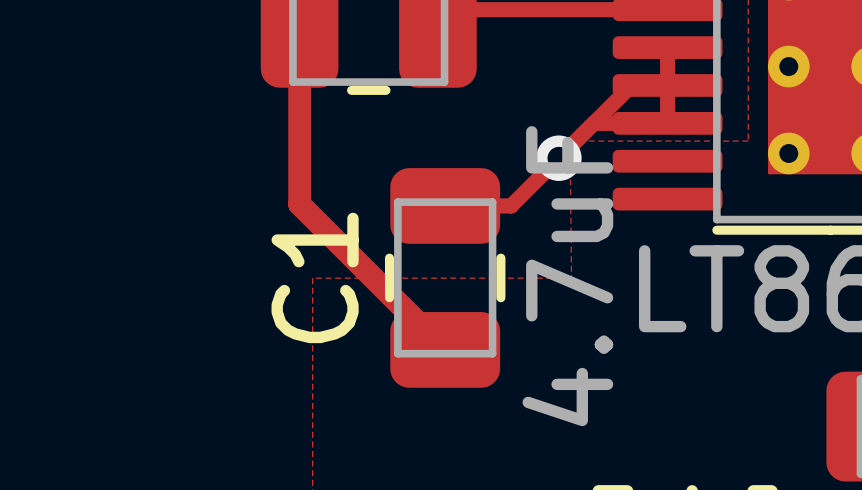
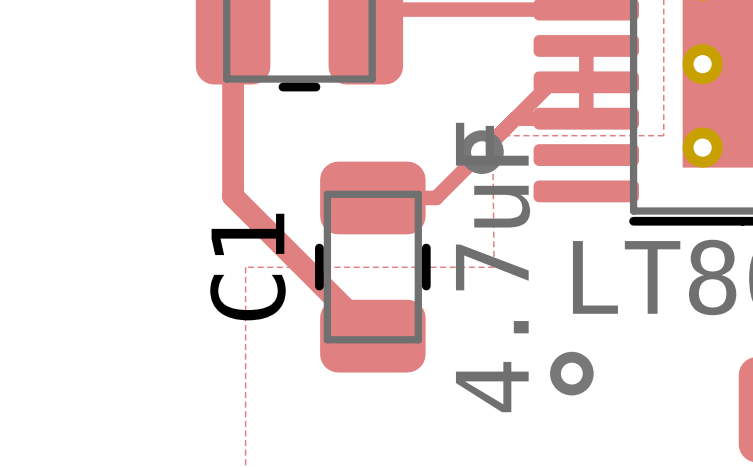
via: none -> (571, 373)

